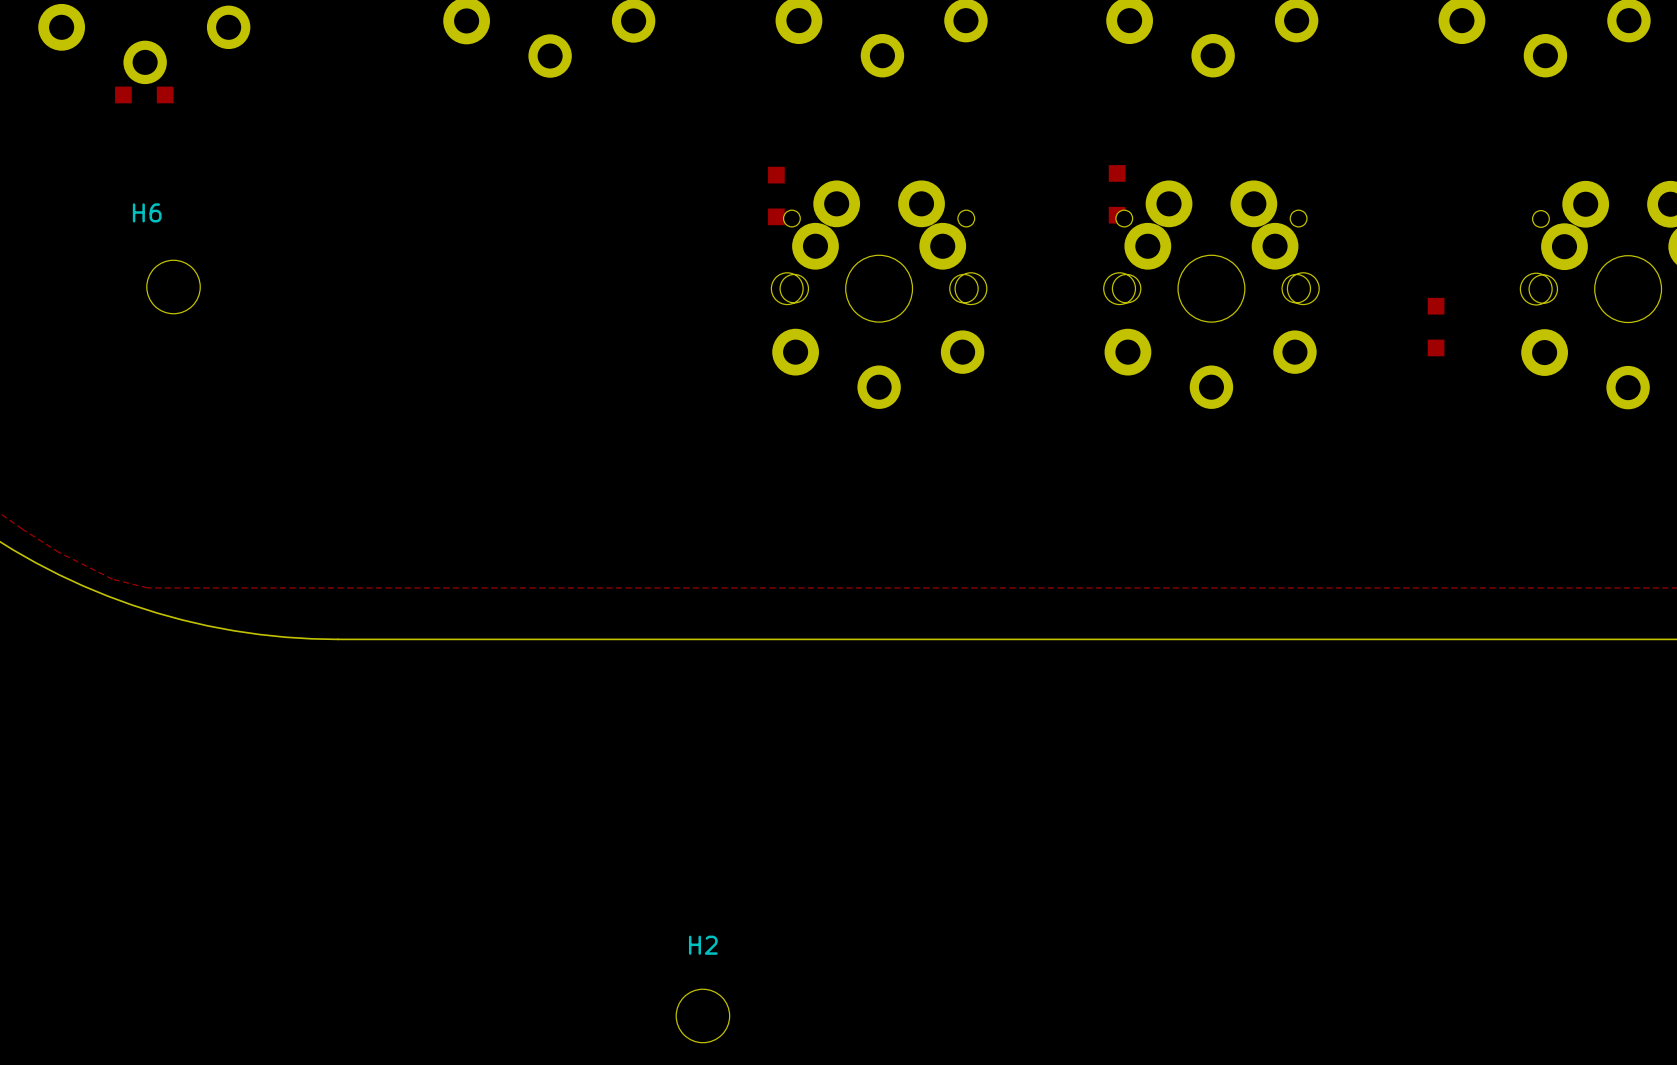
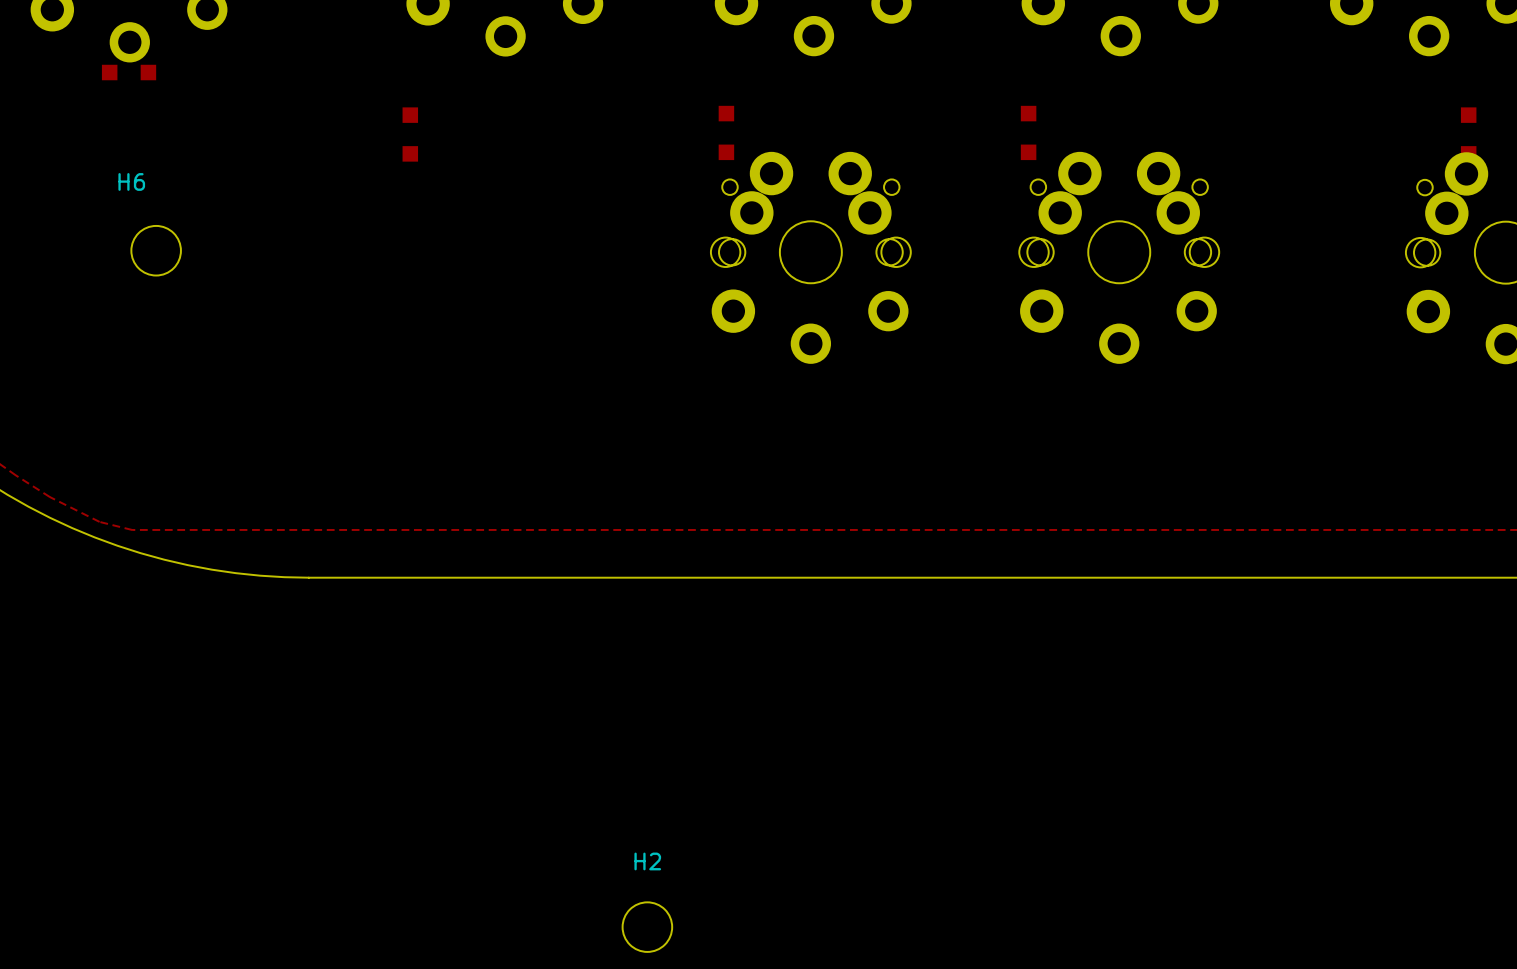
part: none -> (410, 134)
part: none -> (1468, 134)
part position: (1117, 194) -> (1028, 132)
part position: (776, 195) -> (726, 132)
part: (1436, 327) -> none

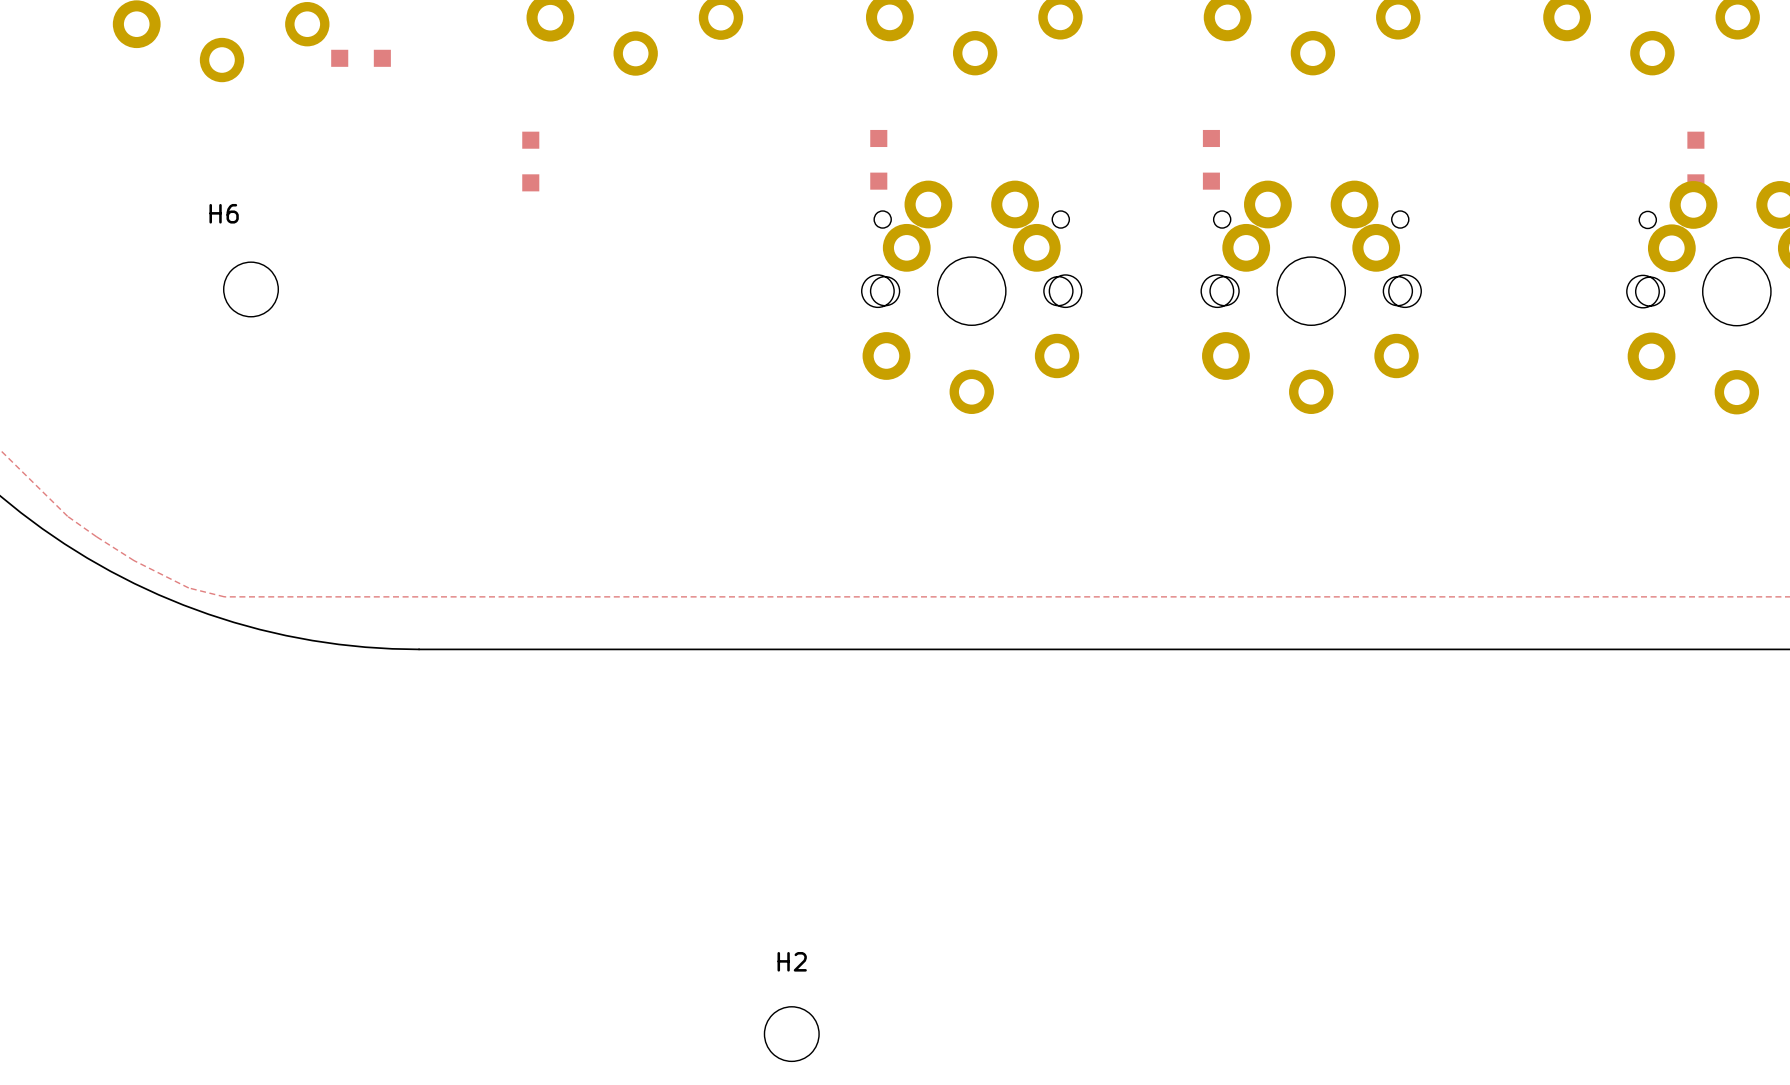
part position: (129, 72) -> (361, 58)

